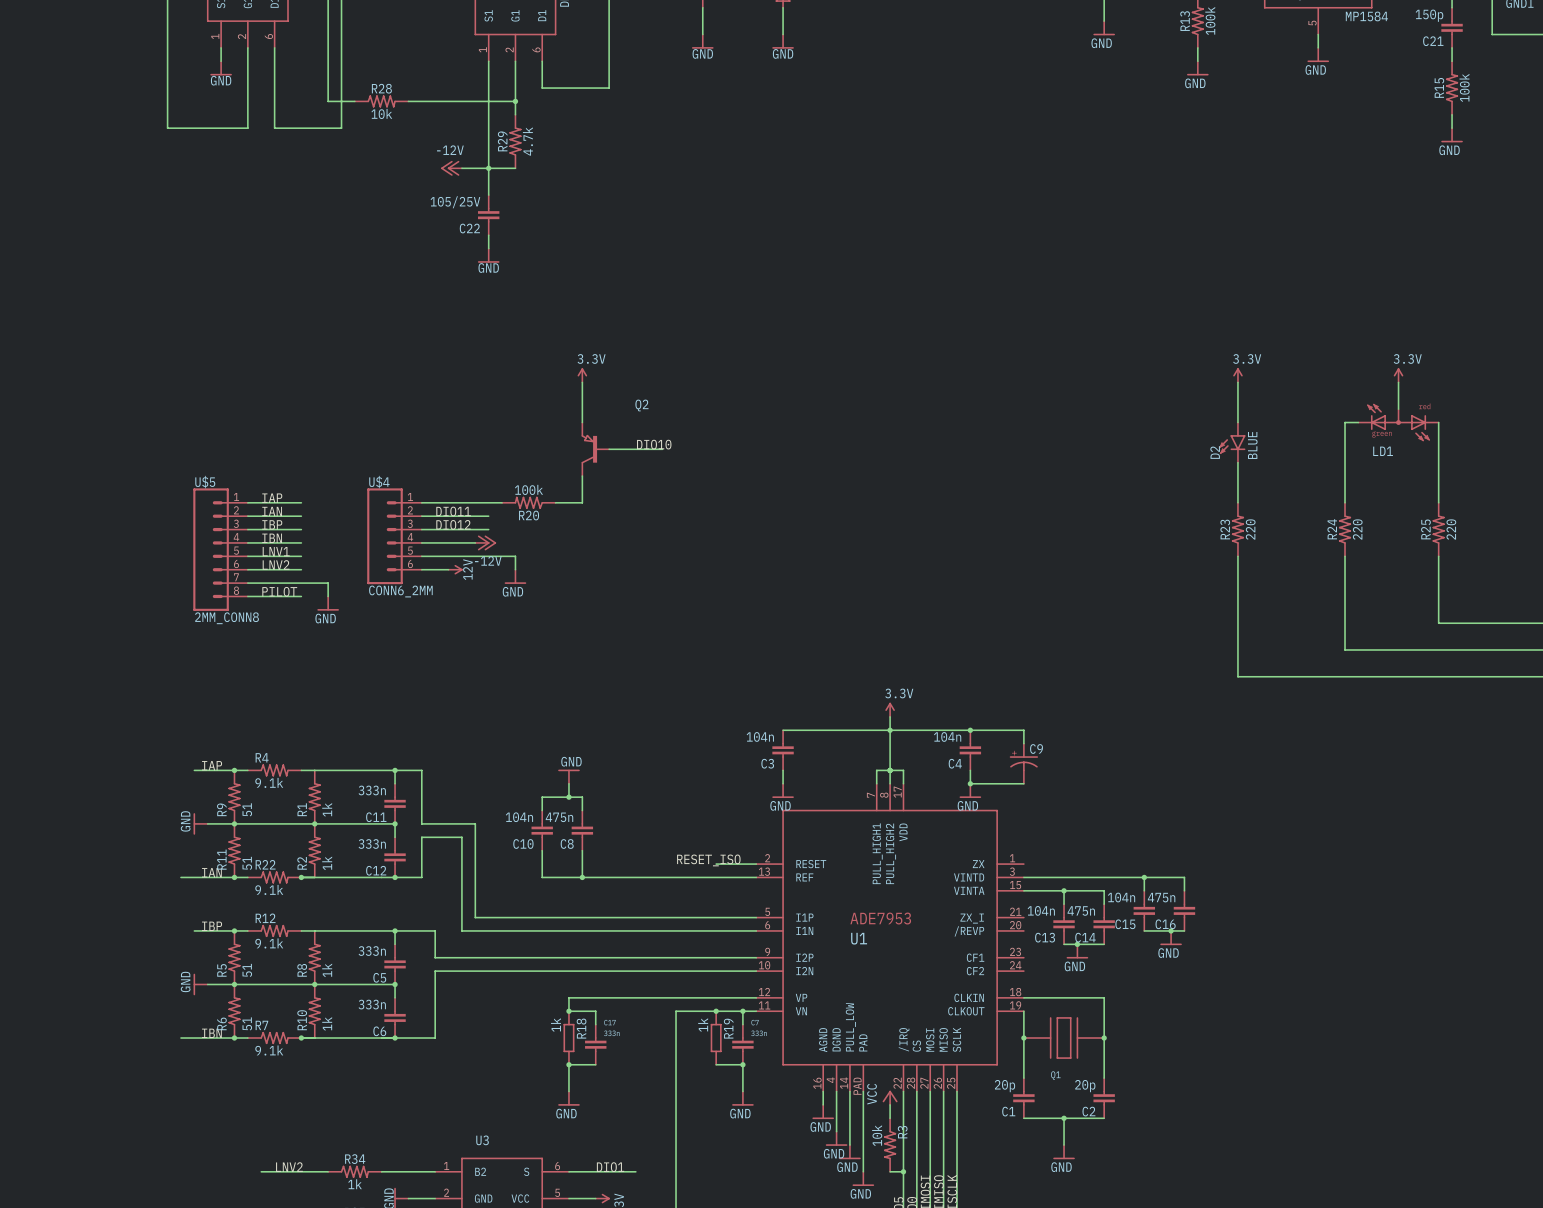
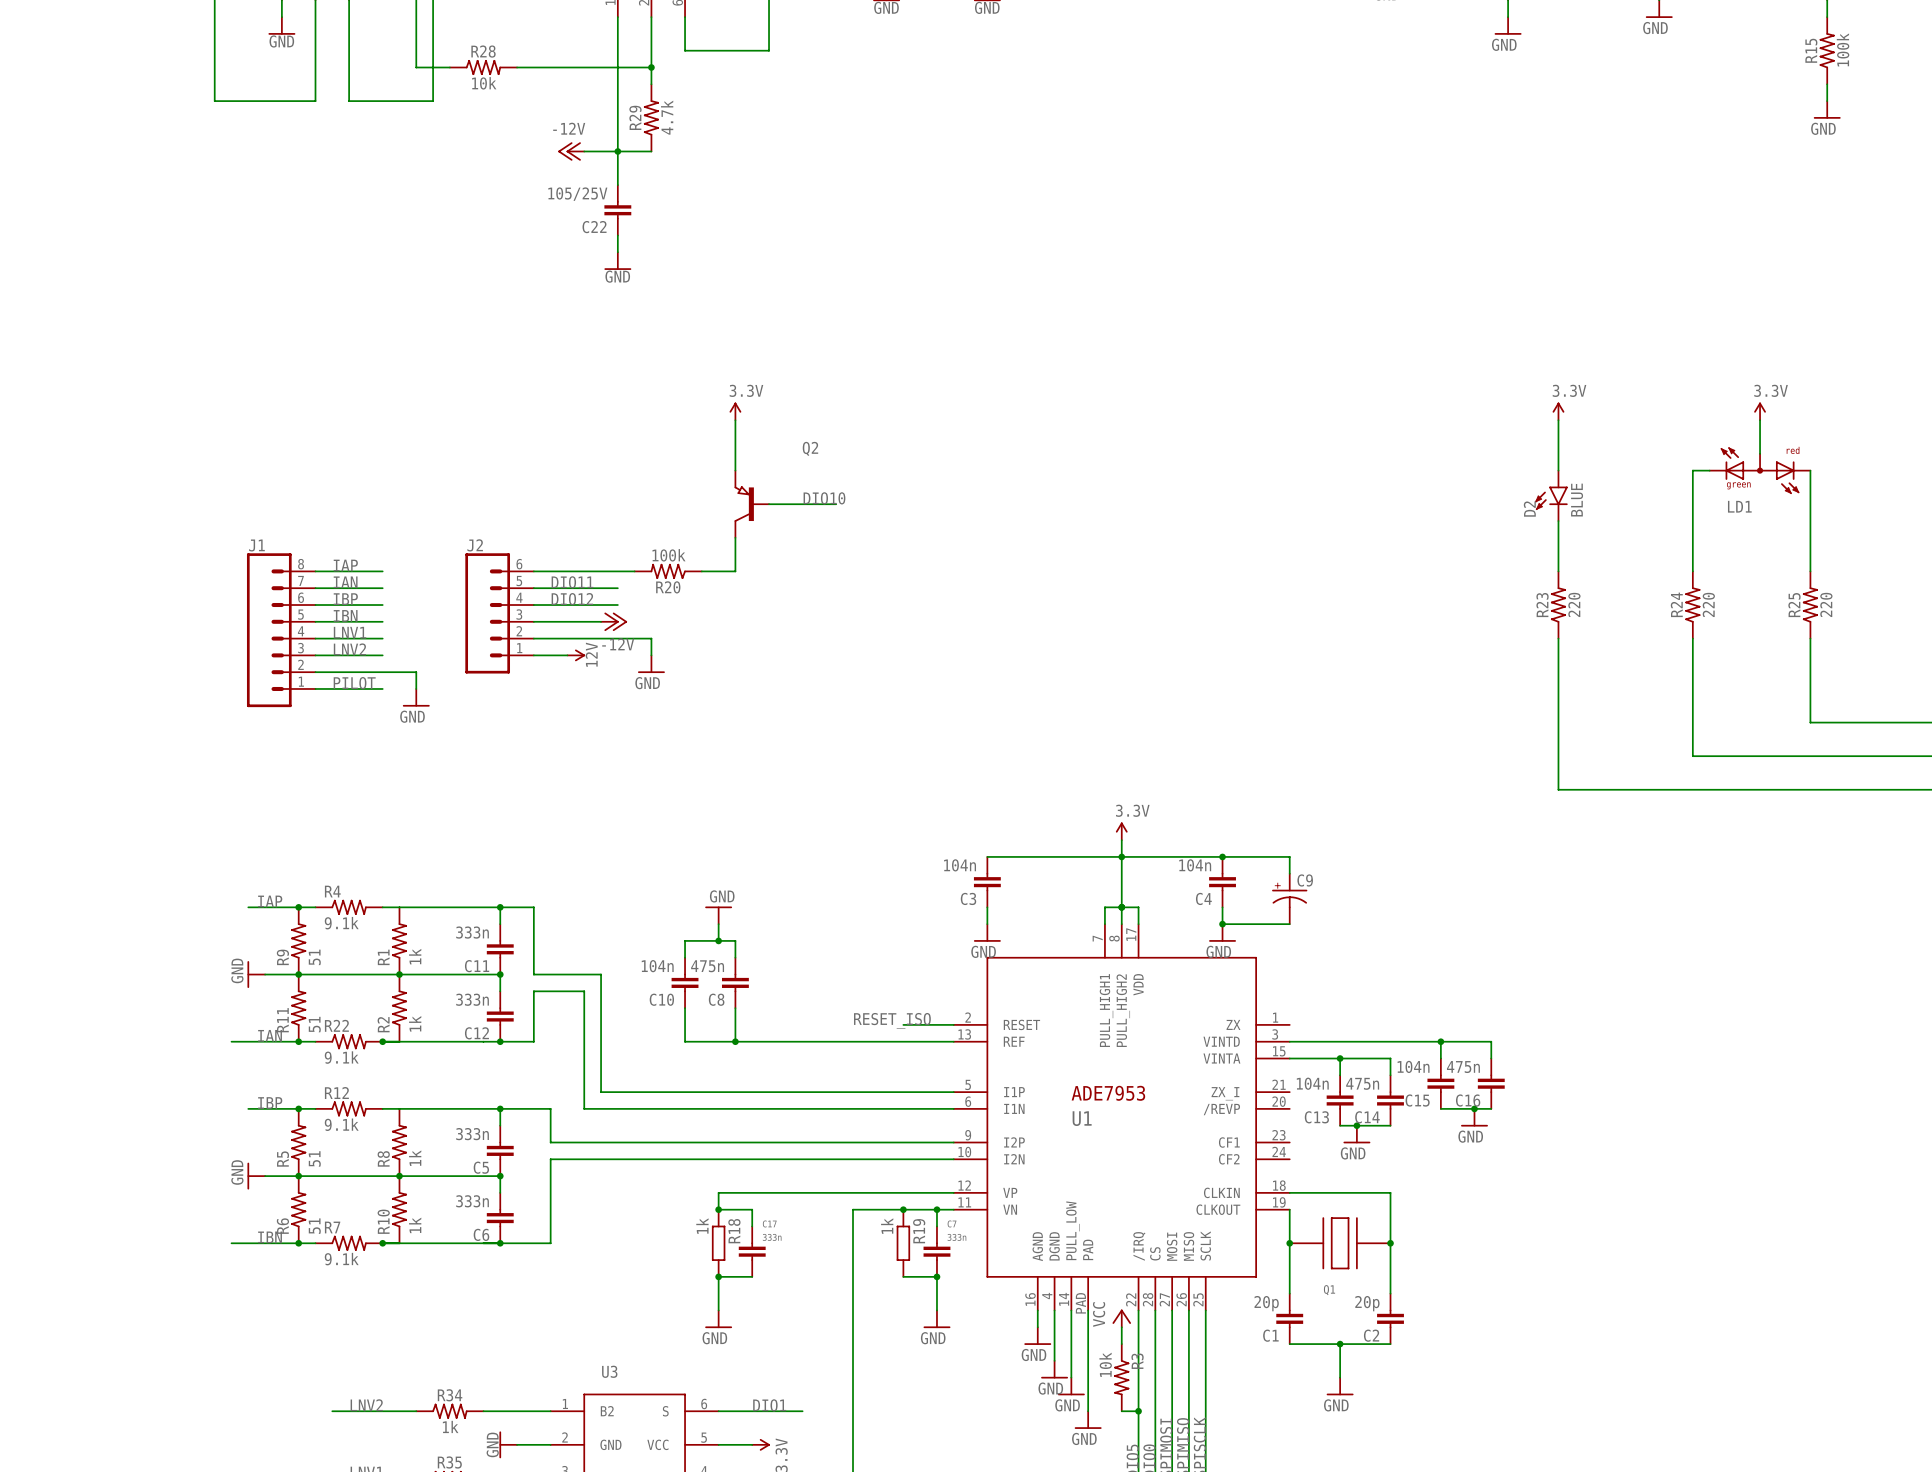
U$5 name: U$5 (205, 482) -> J1 (256, 545)
U$4 name: U$4 (379, 482) -> J2 (475, 545)
U$4 flip: as is (385, 536) -> up-down (487, 613)
U$5 flip: as is (211, 549) -> up-down (269, 630)
U$4 value: CONN6_2MM (400, 591) -> none
U$5 value: 2MM_CONN8 (227, 618) -> none

